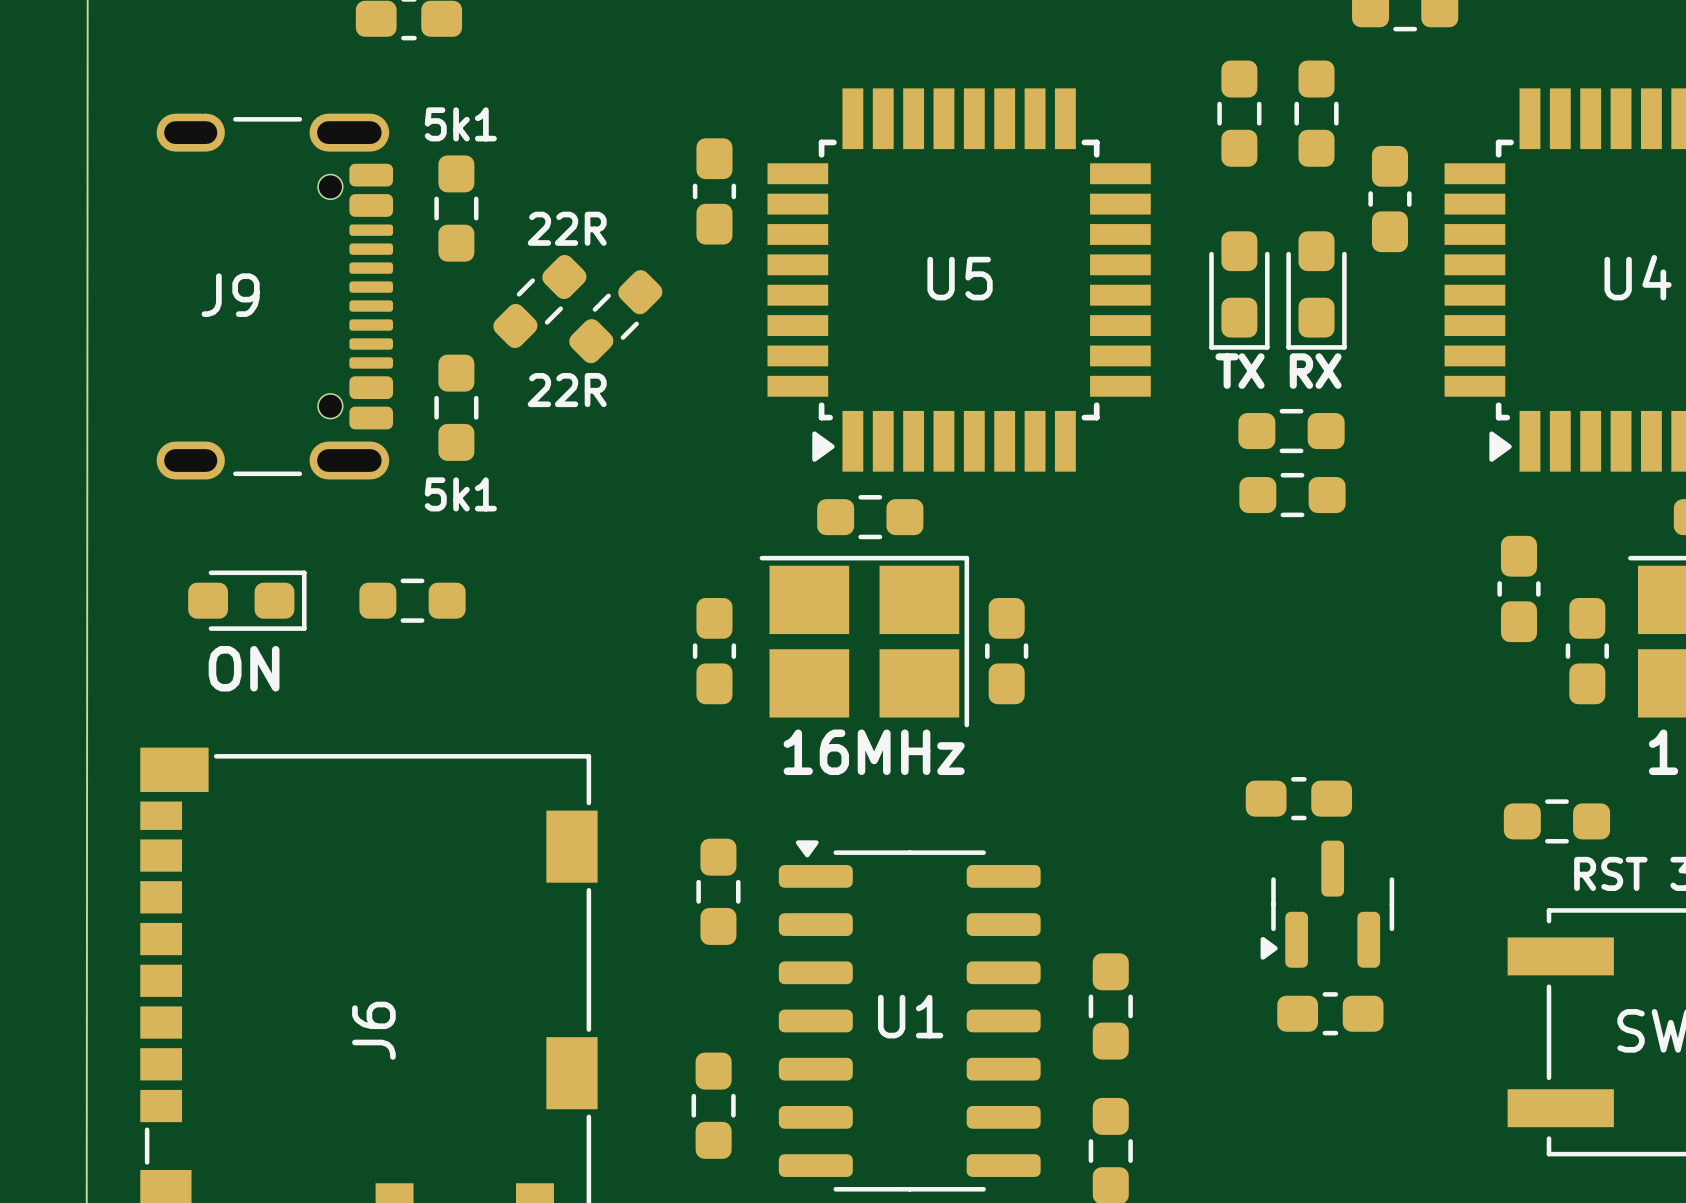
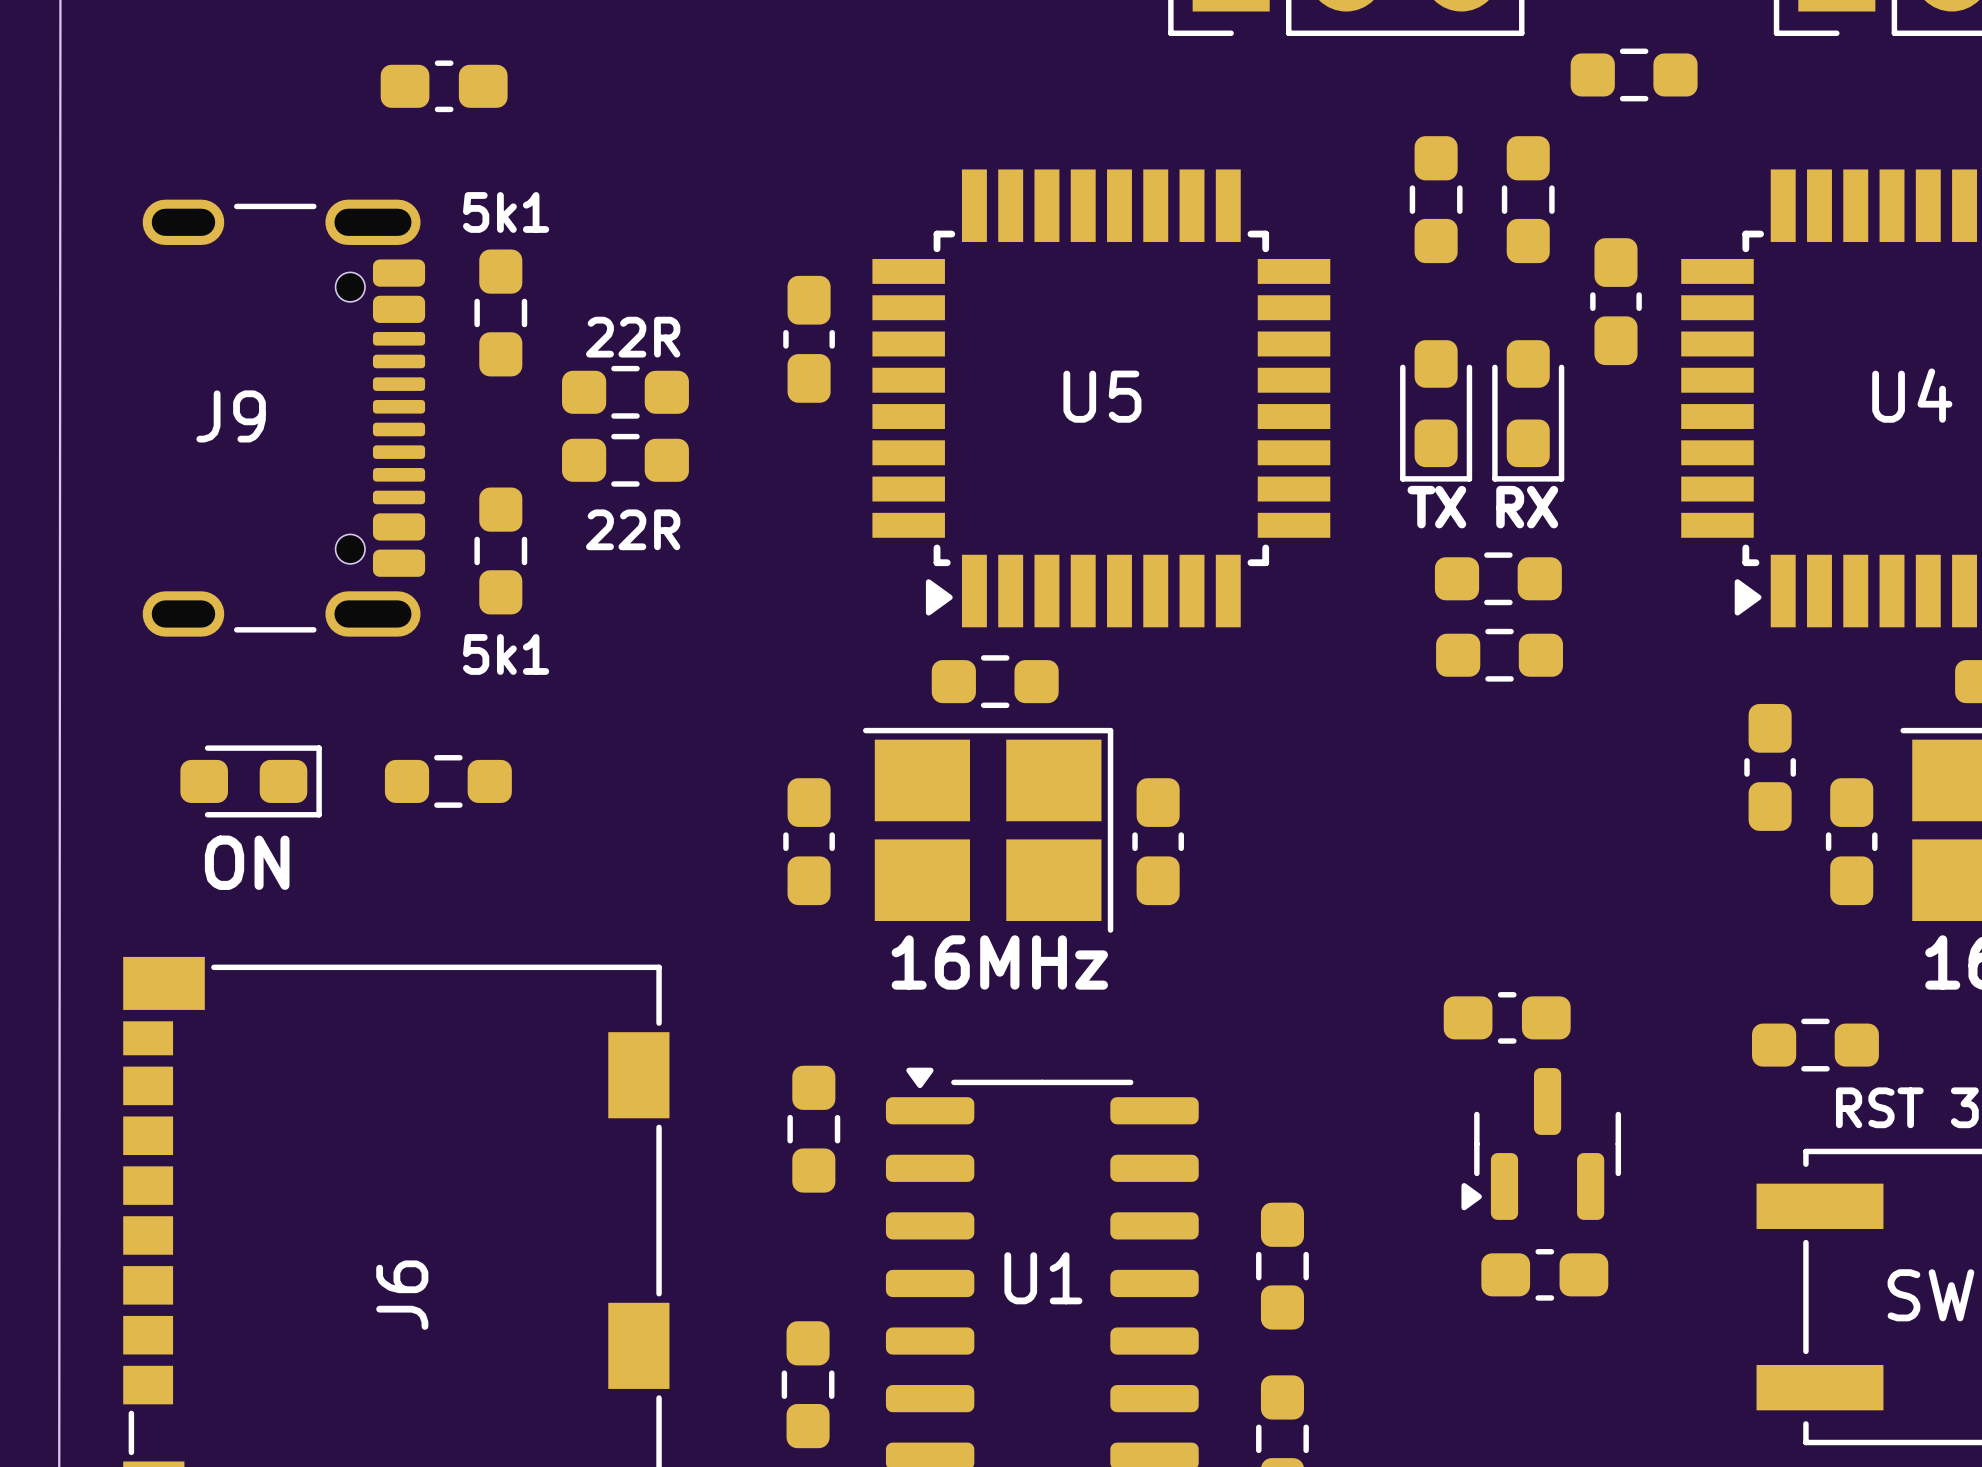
part position: (714, 191) -> (809, 339)
part: none -> (625, 392)
part: (539, 301) -> none
part: (615, 316) -> none
part: none -> (625, 460)

